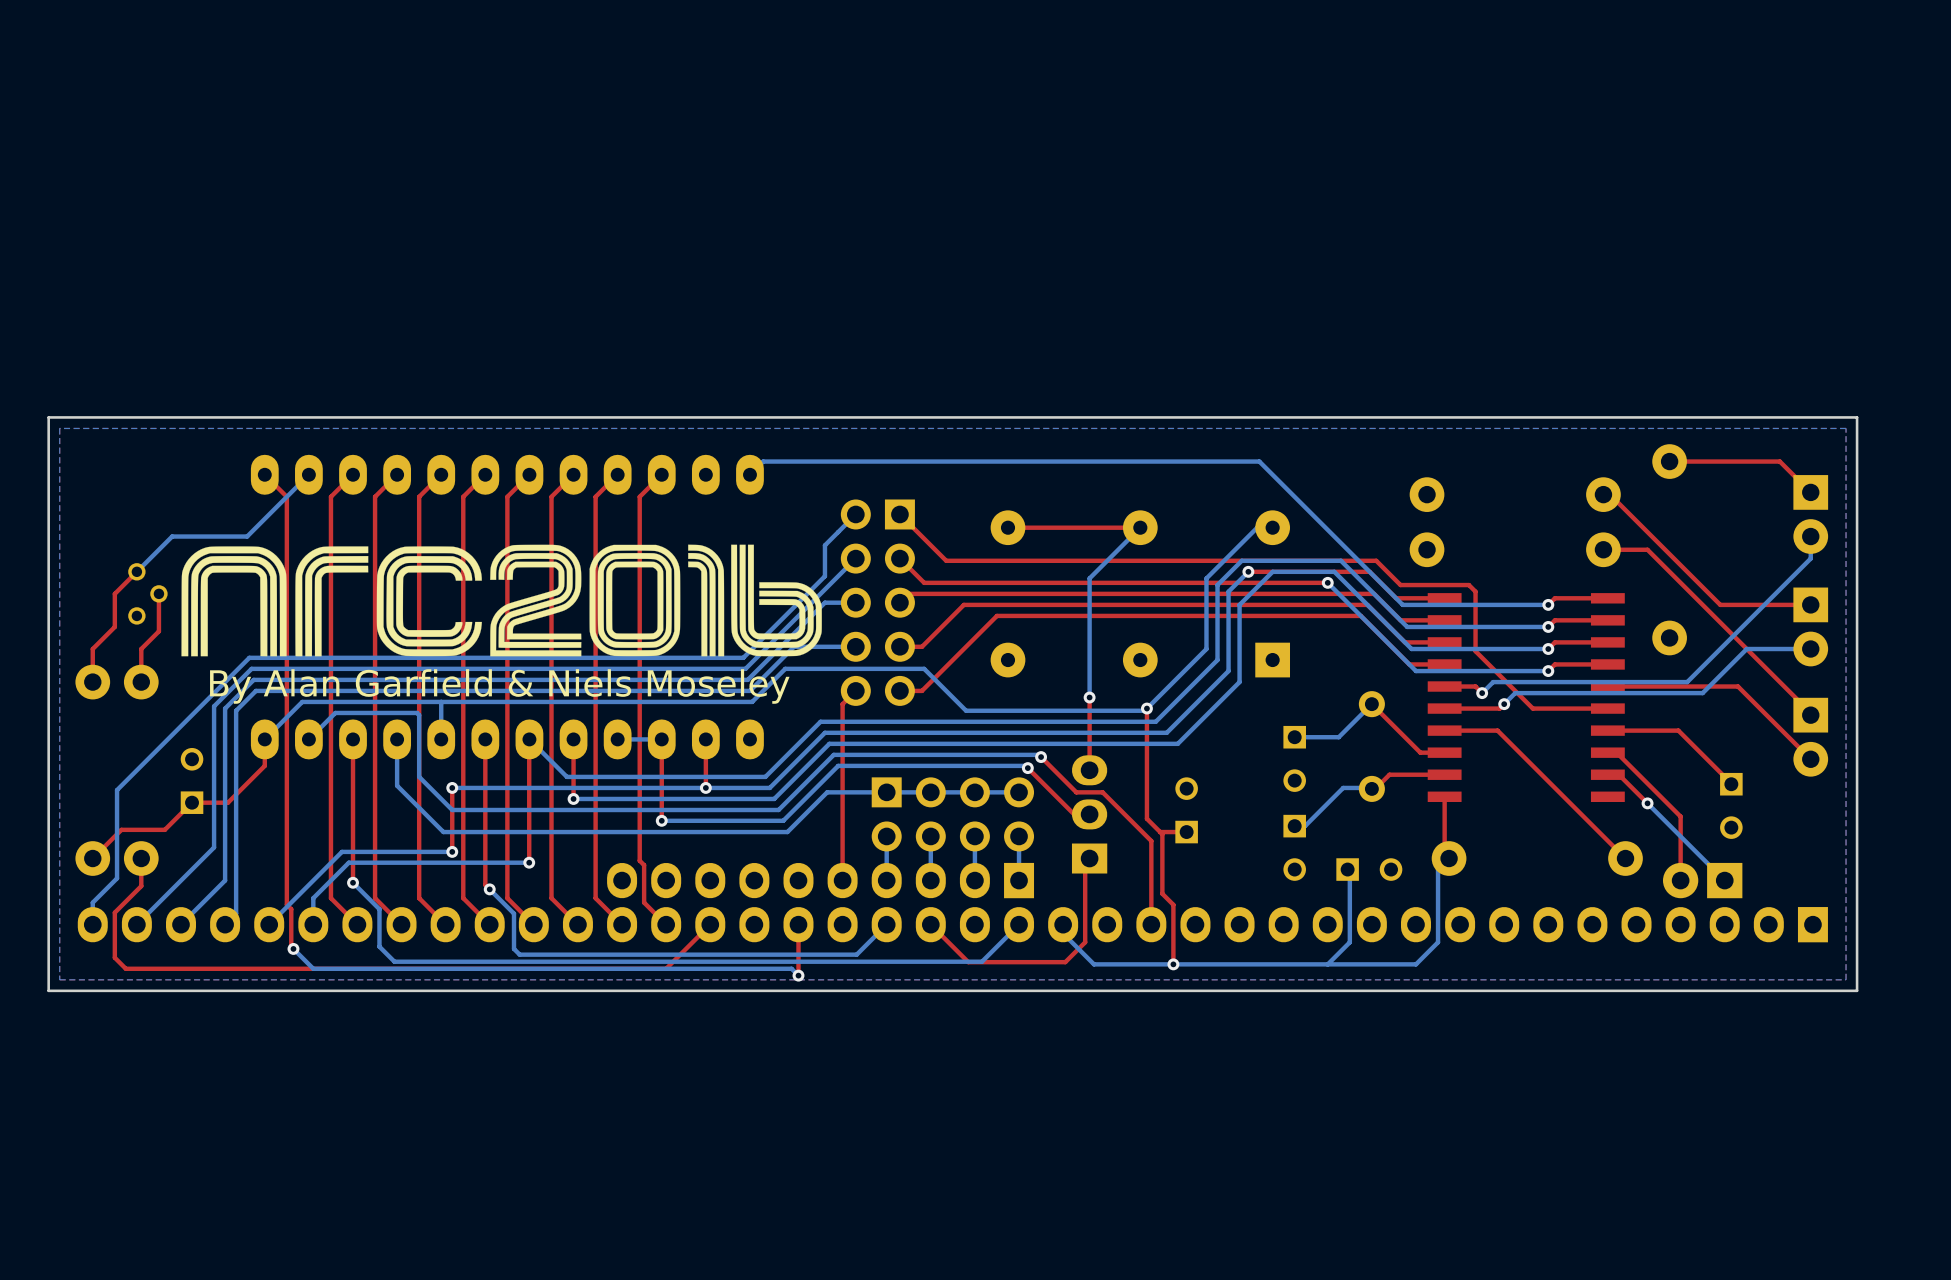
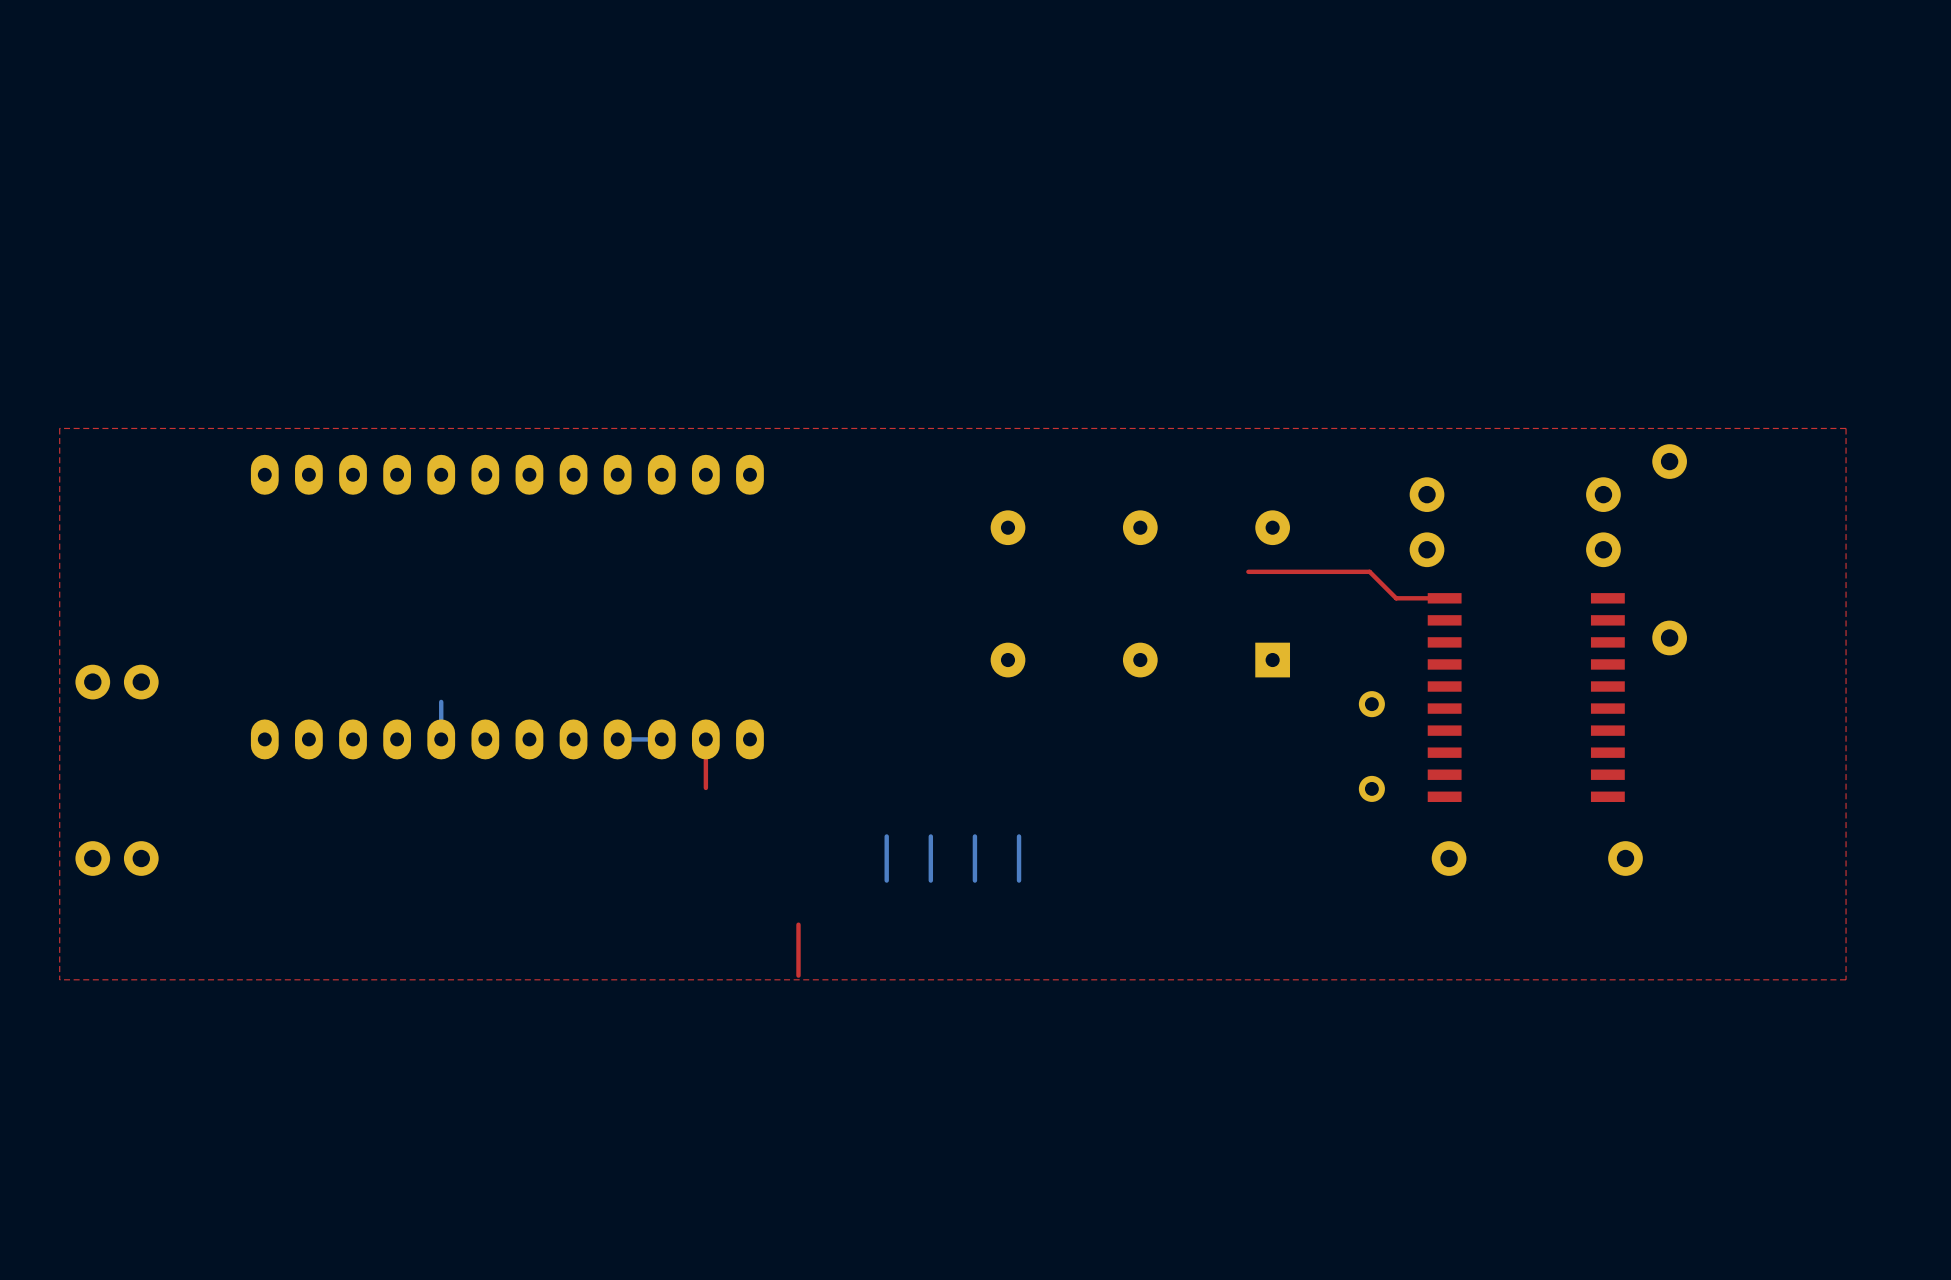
board edge: (1857, 417) (48, 417) (48, 990) (1857, 990) (1857, 417) -> none
bottom zone outline: (1846, 428) (1846, 979) (59, 979) (59, 428) (1846, 428) -> none
top track: (1669, 461) (1779, 461) (1810, 492) -> none
top track: (264, 474) (286, 496) (286, 904) (291, 909) (291, 946) (293, 948) -> none
bottom track: (308, 474) (247, 536) (172, 536) (136, 571) -> none
top track: (353, 474) (330, 496) (330, 898) (357, 924) -> none
top track: (397, 474) (375, 496) (375, 898) (401, 924) -> none
top track: (441, 474) (419, 496) (419, 898) (445, 924) -> none
top track: (485, 474) (463, 496) (463, 898) (489, 924) -> none
top track: (529, 474) (507, 496) (507, 898) (533, 924) -> none
top track: (573, 474) (551, 496) (551, 898) (577, 924) -> none
top track: (617, 474) (595, 496) (595, 898) (622, 924) -> none
top track: (661, 474) (639, 496) (639, 860) (644, 865) (644, 902) (666, 924) -> none
bottom track: (749, 474) (763, 461) (1259, 461) (1402, 604) (1548, 604) -> none
top track: (1603, 494) (1610, 494) (1720, 604) (1810, 604) -> none
bottom track: (855, 514) (824, 545) (824, 576) (743, 657) (249, 657) (117, 790) (117, 878) (92, 902) (92, 924) -> none
top track: (899, 514) (946, 560) (1376, 560) (1400, 585) (1468, 585) (1475, 591) (1475, 651) (1532, 708) (1607, 708) -> none
part: (1810, 514) -> none
top track: (1140, 527) (1008, 527) -> none
bottom track: (1140, 527) (1089, 578) (1089, 697) -> none
bottom track: (1272, 527) (1257, 527) (1206, 578) (1206, 649) (1144, 710) (966, 710) (924, 668) (785, 668) (752, 701) (302, 701) (264, 739) -> none
bottom track: (1810, 536) (1810, 558) (1687, 682) (1493, 682) (1482, 693) -> none
drawing: [181, 544, 822, 657] -> none
top track: (1603, 549) (1647, 549) (1810, 712) -> none
top track: (899, 558) (924, 582) (1327, 582) -> none
bottom track: (851, 563) (745, 668) (251, 668) (214, 706) (214, 847) (136, 924) -> none
top track: (136, 571) (114, 593) (114, 626) (92, 649) (92, 682) -> none
bottom track: (1248, 571) (1228, 591) (1228, 671) (1166, 732) (824, 732) (769, 787) (452, 787) -> none
via: (1248, 571) -> none
bottom track: (1327, 582) (1415, 671) (1548, 671) -> none
via: (1327, 582) -> none
part: (147, 593) -> none
top track: (158, 593) (158, 631) (141, 649) (141, 682) -> none
top track: (1607, 598) (1554, 598) (1548, 604) -> none
bottom track: (855, 602) (824, 602) (747, 679) (253, 679) (225, 708) (225, 880) (180, 924) -> none
part: (877, 602) -> none
top track: (899, 602) (908, 593) (1374, 593) (1400, 620) (1444, 620) -> none
via: (1548, 604) -> none
top track: (1607, 620) (1554, 620) (1548, 626) -> none
bottom track: (1548, 626) (1407, 626) (1341, 560) (1241, 560) (1217, 585) (1217, 660) (1155, 721) (820, 721) (765, 776) (566, 776) (529, 739) -> none
via: (1548, 626) -> none
part: (1810, 626) -> none
top track: (1444, 642) (1404, 642) (1367, 604) (963, 604) (921, 646) (899, 646) -> none
top track: (1607, 642) (1554, 642) (1548, 649) -> none
bottom track: (855, 646) (794, 646) (749, 690) (255, 690) (236, 710) (236, 913) (225, 924) -> none
bottom track: (1548, 649) (1411, 649) (1334, 571) (1272, 571) (1239, 604) (1239, 682) (1177, 743) (829, 743) (774, 798) (573, 798) -> none
via: (1548, 649) -> none
bottom track: (1810, 649) (1746, 649) (1702, 693) (1515, 693) (1504, 704) -> none
top track: (1444, 664) (1409, 664) (1360, 615) (996, 615) (921, 690) (899, 690) -> none
top track: (1607, 664) (1554, 664) (1548, 671) -> none
via: (1548, 671) -> none
text: By Alan Garfield & Niels Moseley (499, 686) -> none
top track: (1444, 686) (1475, 686) (1482, 693) -> none
top track: (1607, 686) (1737, 686) (1810, 759) -> none
top track: (855, 690) (842, 704) (842, 880) -> none
via: (1482, 693) -> none
top track: (1089, 697) (1089, 770) -> none
via: (1089, 697) -> none
top track: (1371, 704) (1420, 752) (1444, 752) -> none
bottom track: (1371, 704) (1338, 737) (1294, 737) -> none
top track: (1504, 704) (1499, 708) (1444, 708) -> none
via: (1504, 704) -> none
top track: (1146, 708) (1146, 818) (1162, 834) (1162, 893) (1173, 904) (1173, 964) -> none
via: (1146, 708) -> none
top track: (1444, 730) (1497, 730) (1625, 858) -> none
top track: (1607, 730) (1678, 730) (1731, 783) -> none
part: (1810, 737) -> none
top track: (264, 739) (264, 765) (228, 802) (192, 802) (164, 829) (121, 829) (92, 858) -> none
bottom track: (308, 739) (335, 712) (416, 712) (419, 715) (419, 776) (452, 809) (778, 809) (833, 754) (1038, 754) (1041, 757) -> none
top track: (353, 739) (353, 882) -> none
bottom track: (397, 739) (397, 785) (443, 832) (787, 832) (827, 792) (1019, 792) -> none
top track: (485, 739) (485, 884) (489, 889) -> none
top track: (529, 739) (529, 862) -> none
top track: (573, 739) (573, 798) -> none
top track: (661, 739) (661, 820) -> none
top track: (1607, 752) (1616, 752) (1680, 816) (1680, 880) -> none
top track: (1041, 757) (1076, 792) (1102, 792) (1151, 841) (1151, 924) -> none
via: (1041, 757) -> none
part: (1294, 758) -> none
top track: (1027, 768) (1074, 814) (1089, 814) -> none
bottom track: (1027, 768) (1025, 765) (838, 765) (783, 820) (661, 820) -> none
via: (1027, 768) -> none
top track: (1444, 774) (1389, 774) (1375, 788) (1371, 788) -> none
top track: (1607, 774) (1618, 774) (1647, 803) -> none
part: (192, 780) -> none
top track: (452, 787) (452, 851) -> none
via: (452, 787) -> none
via: (705, 787) -> none
bottom track: (1371, 787) (1343, 787) (1305, 826) (1294, 826) -> none
top track: (1444, 796) (1444, 854) (1449, 858) -> none
via: (573, 798) -> none
bottom track: (1647, 803) (1724, 880) -> none
via: (1647, 803) -> none
part: (1731, 805) -> none
part: (1186, 810) -> none
part: (952, 814) -> none
part: (1089, 814) -> none
via: (661, 820) -> none
top track: (1186, 832) (1160, 832) -> none
part: (1294, 847) -> none
bottom track: (452, 851) (341, 851) (269, 924) -> none
via: (452, 851) -> none
top track: (141, 858) (141, 886) (114, 912) (114, 957) (125, 968) (666, 968) (710, 924) -> none
top track: (1089, 858) (1085, 862) (1085, 942) (1065, 962) (968, 962) (930, 924) -> none
bottom track: (1449, 858) (1438, 869) (1438, 942) (1415, 964) (1094, 964) (1063, 933) (1063, 924) -> none
bottom track: (529, 862) (348, 862) (313, 898) (313, 924) -> none
via: (529, 862) -> none
bottom track: (1347, 869) (1349, 871) (1349, 942) (1327, 964) -> none
part: (1369, 869) -> none
part: (820, 880) -> none
part: (1702, 880) -> none
bottom track: (353, 882) (379, 909) (379, 946) (394, 961) (981, 961) (1019, 924) -> none
via: (353, 882) -> none
bottom track: (489, 889) (514, 913) (514, 948) (519, 954) (856, 954) (886, 924) -> none
via: (489, 889) -> none
part: (952, 924) -> none
bottom track: (293, 948) (313, 968) (791, 968) (798, 975) -> none
via: (293, 948) -> none
via: (1173, 964) -> none
via: (798, 975) -> none

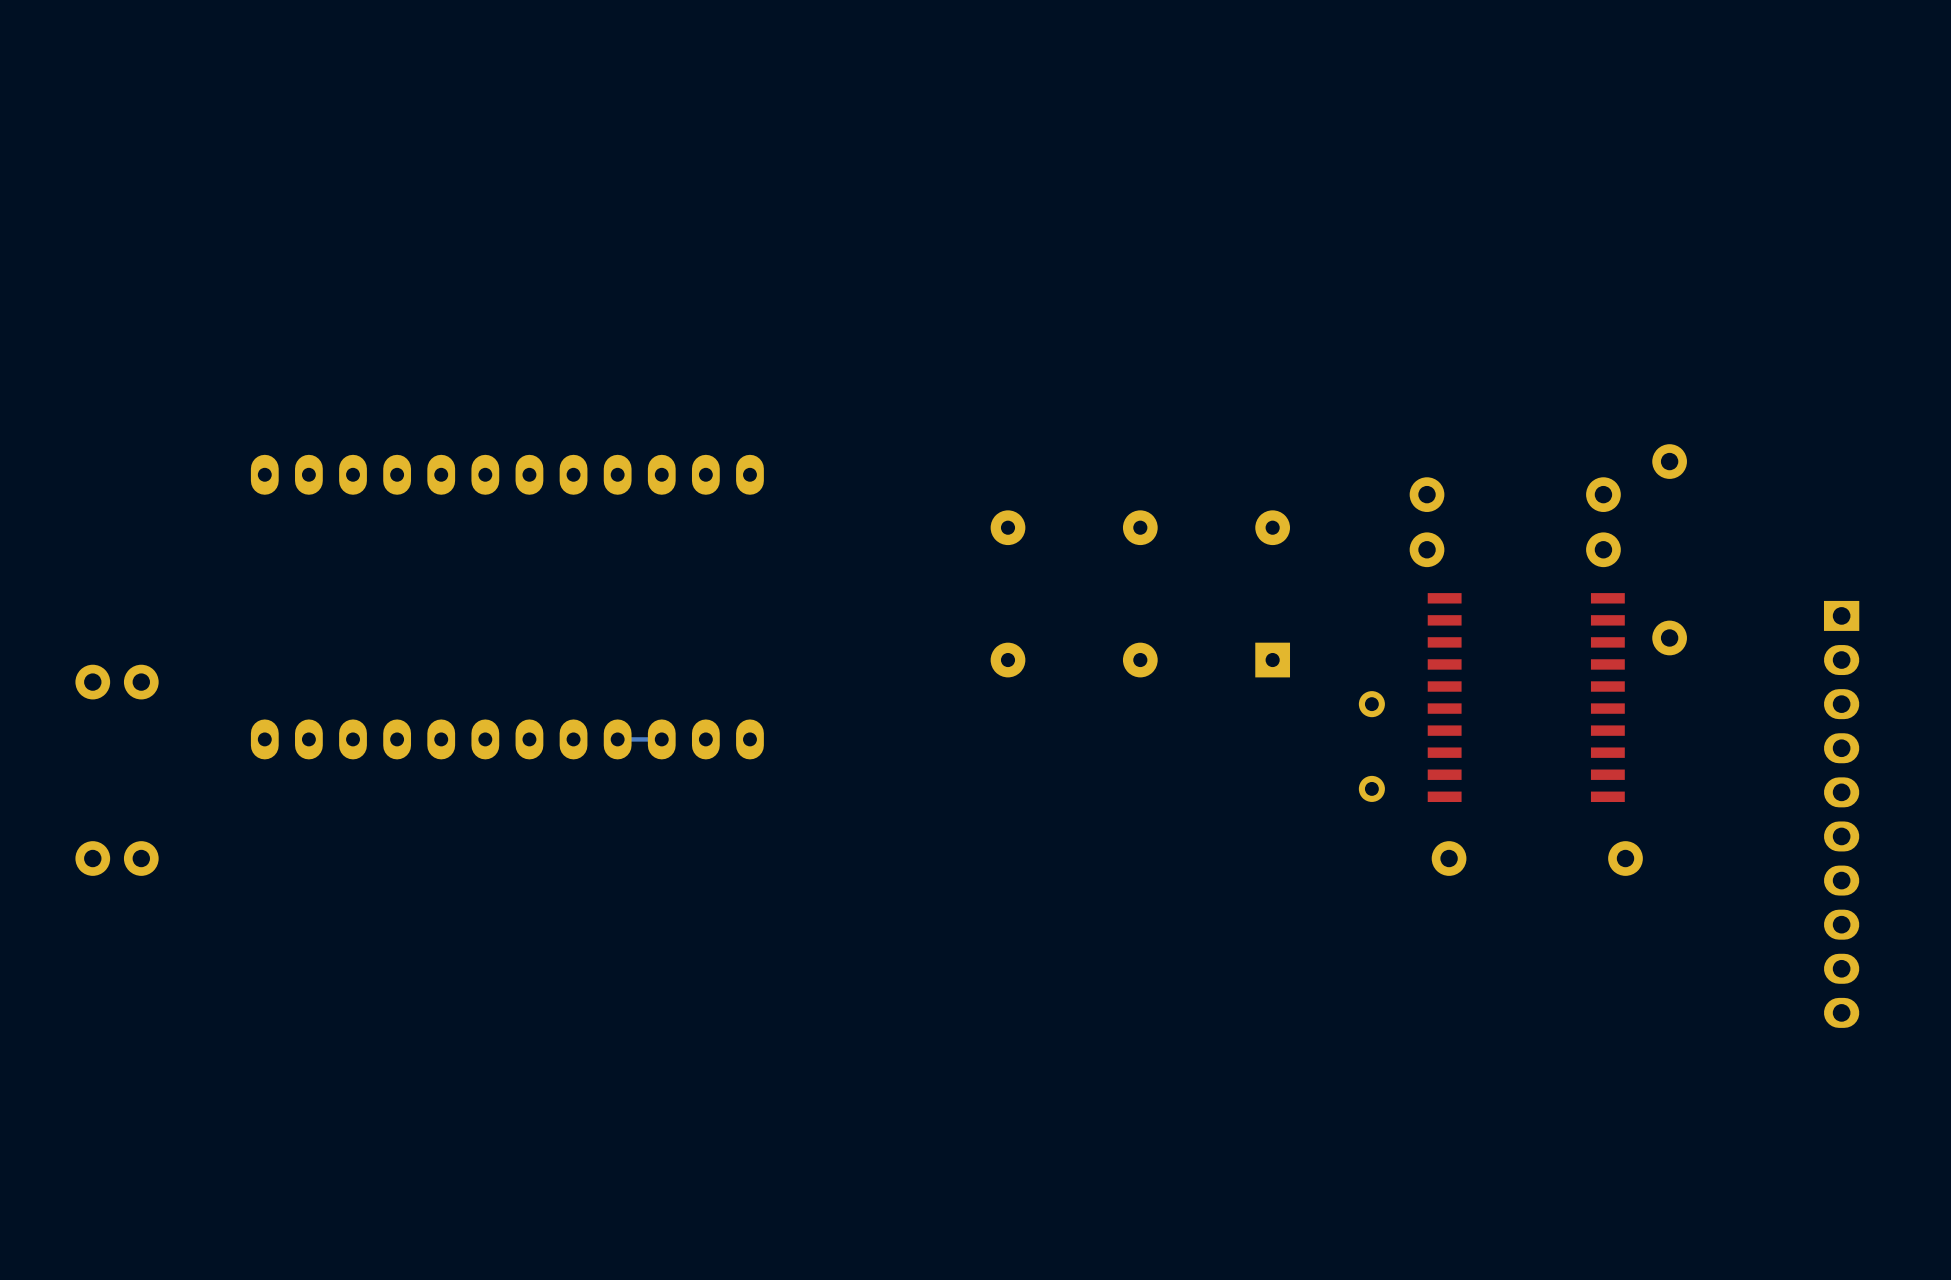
top zone outline: (1846, 428) (1846, 979) (59, 979) (59, 428) (1846, 428) -> none
top track: (1248, 571) (1369, 571) (1396, 598) (1444, 598) -> none
bottom track: (441, 701) (441, 739) -> none
top track: (705, 739) (705, 787) -> none
part: none -> (1841, 814)
bottom track: (886, 836) (886, 880) -> none
bottom track: (930, 836) (930, 880) -> none
bottom track: (974, 836) (974, 880) -> none
bottom track: (1019, 836) (1019, 880) -> none
top track: (798, 924) (798, 975) -> none

